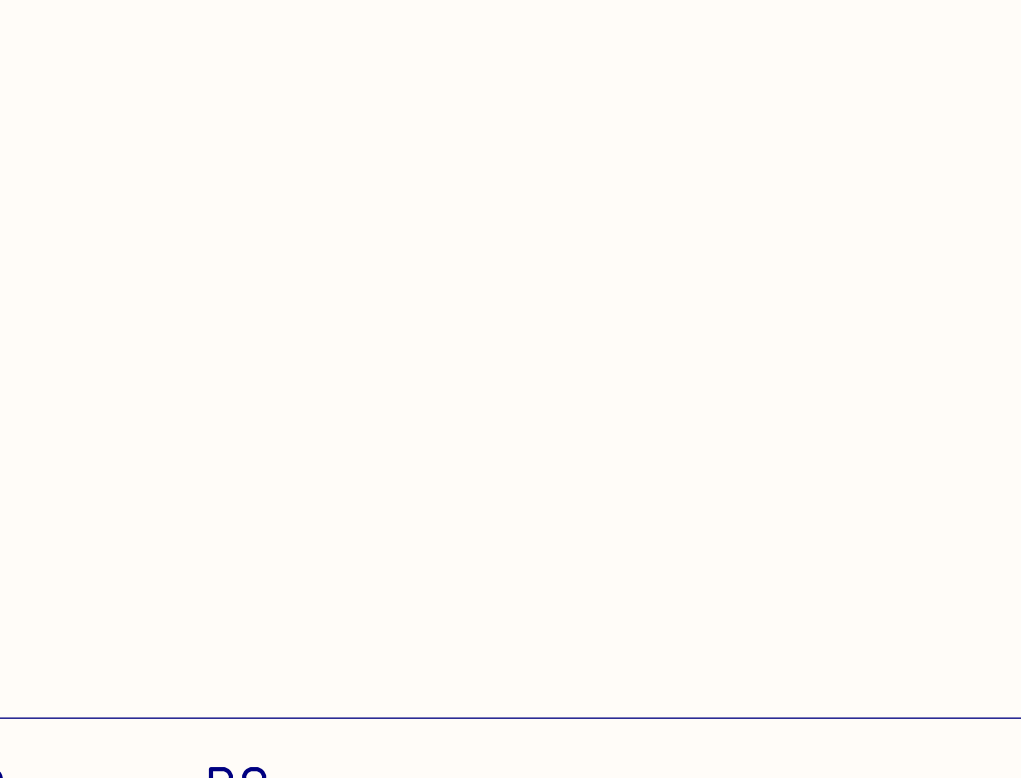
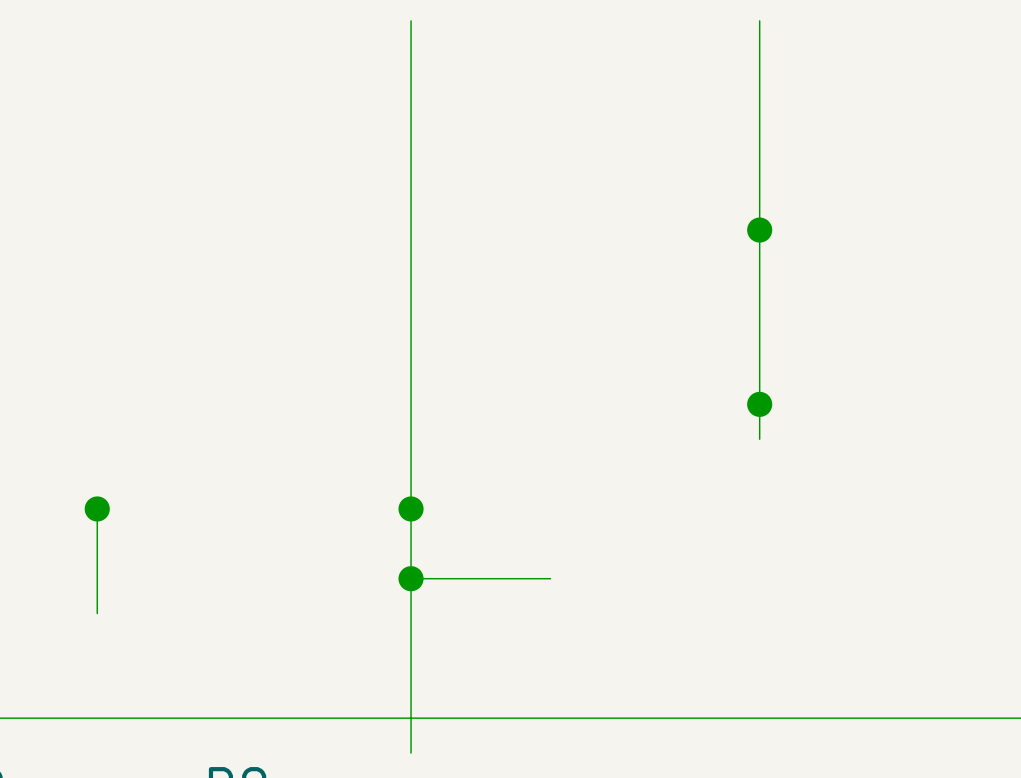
wire: none -> (411, 20) (411, 753)
wire: none -> (759, 20) (759, 439)
junction: none -> (759, 230)
junction: none -> (759, 404)
wire: none -> (97, 508) (97, 613)
junction: none -> (97, 508)
junction: none -> (411, 508)
wire: none -> (411, 578) (550, 578)
junction: none -> (411, 578)

